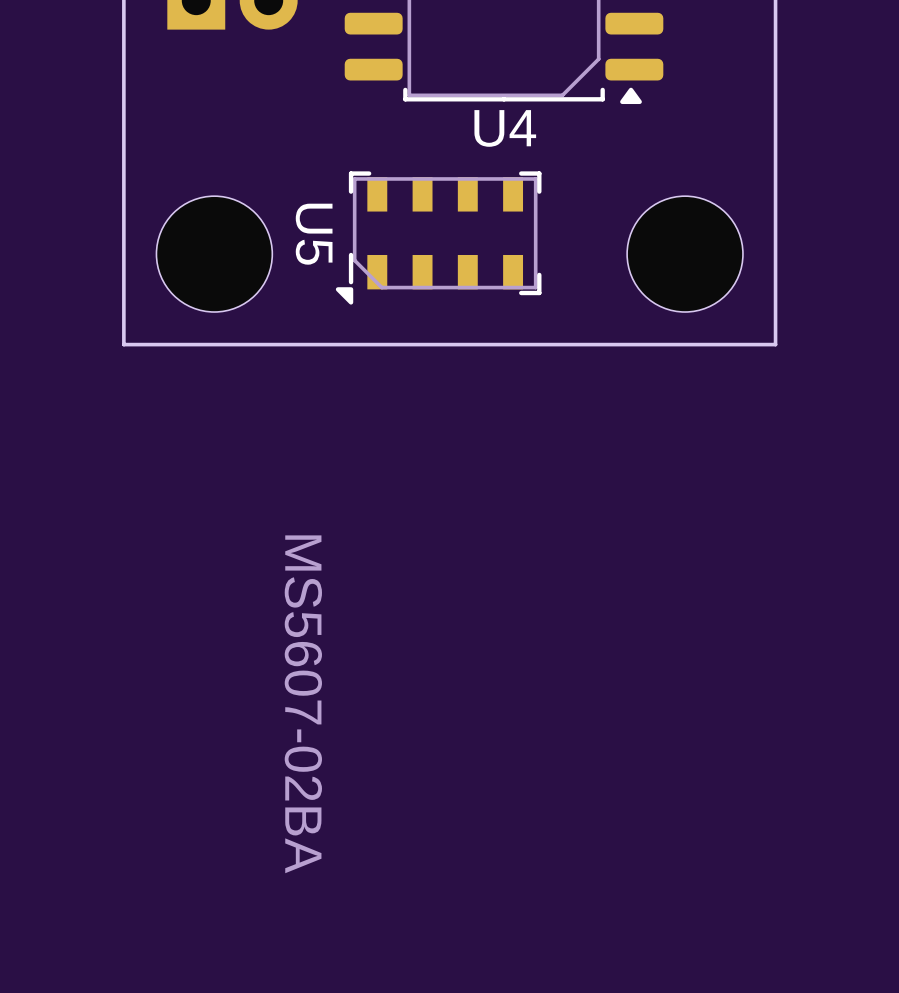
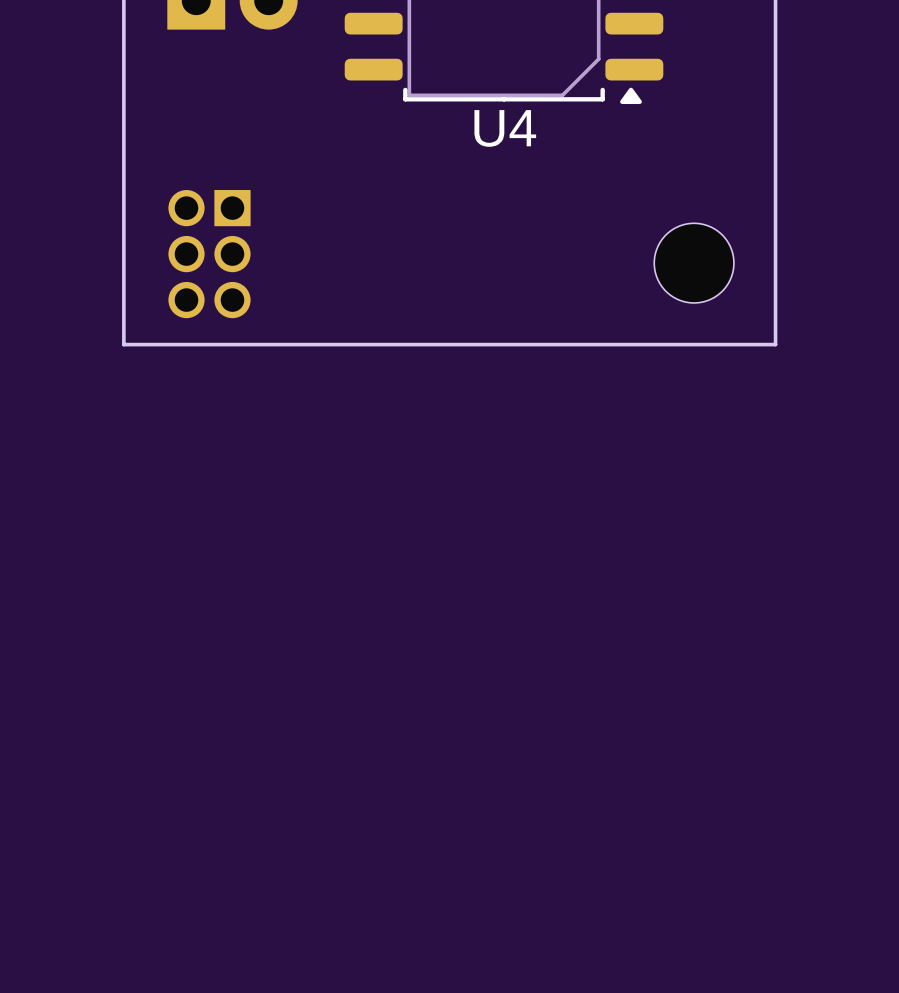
part footprint: [156, 196, 273, 313] -> [168, 190, 251, 319]
part footprint: [627, 196, 743, 313] -> [654, 223, 734, 303]
U5: MS5607-02BA (438, 237) -> none

